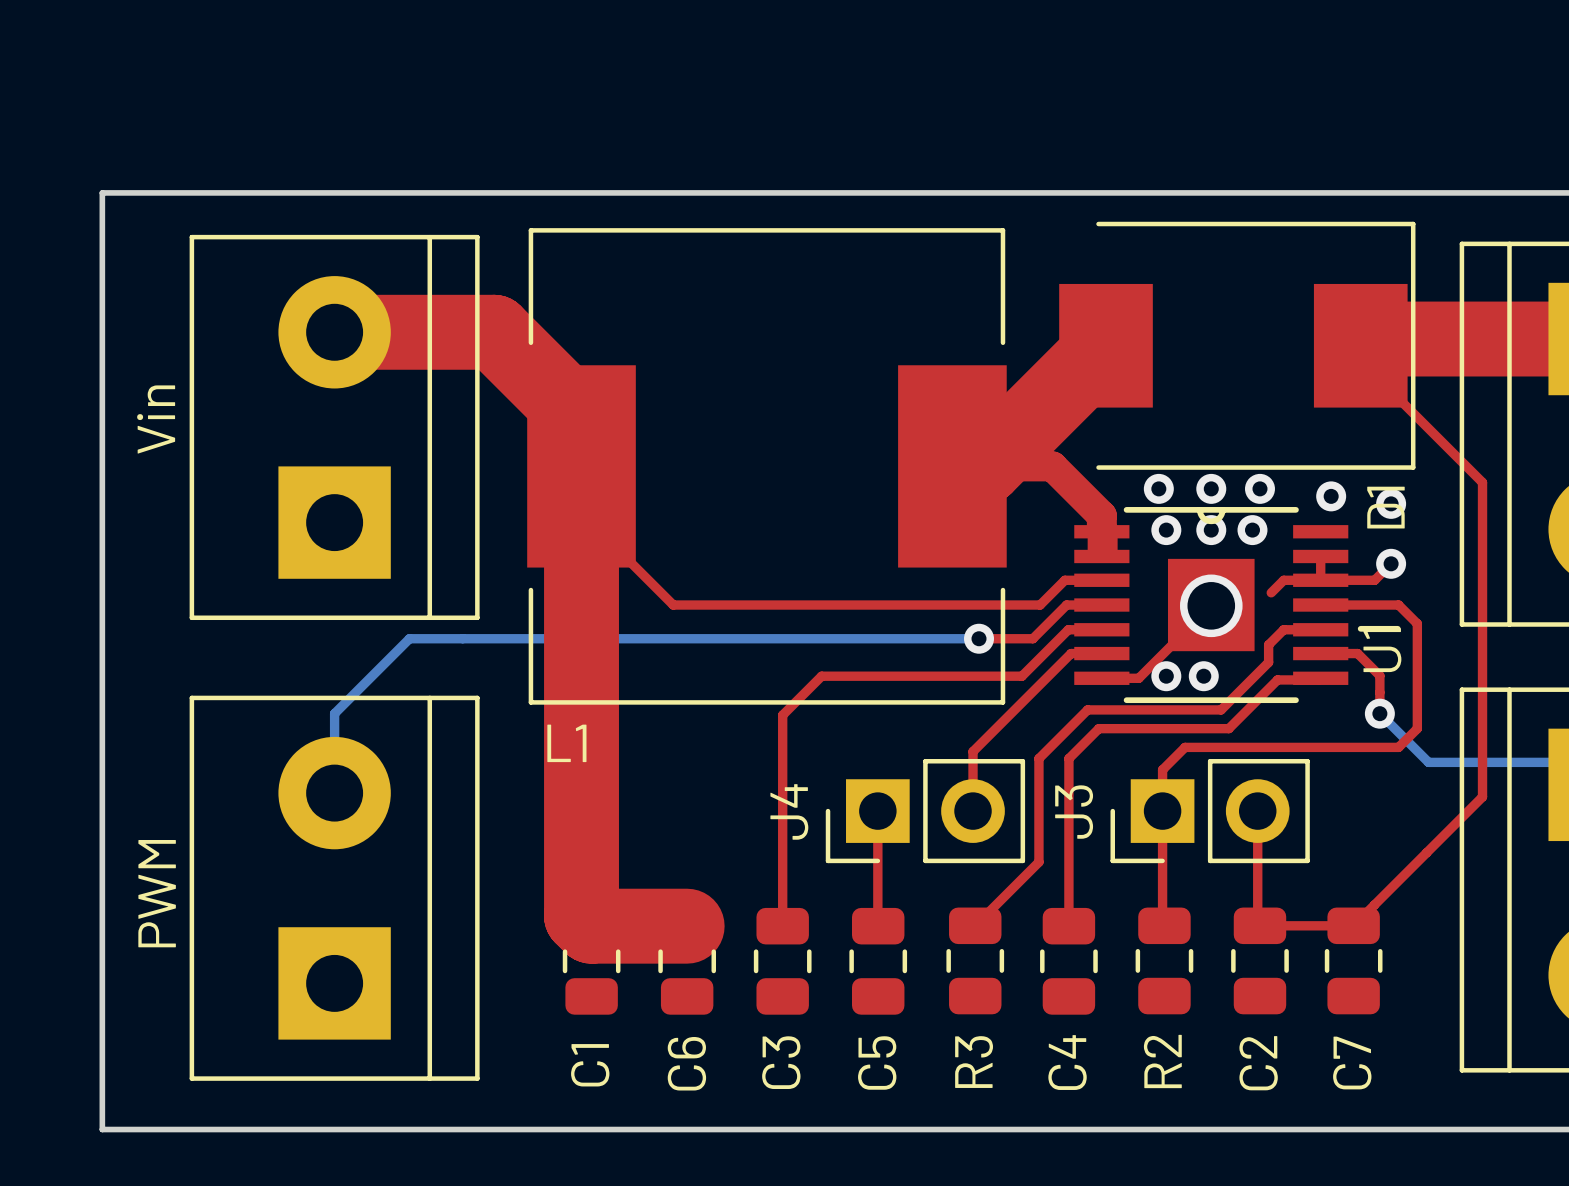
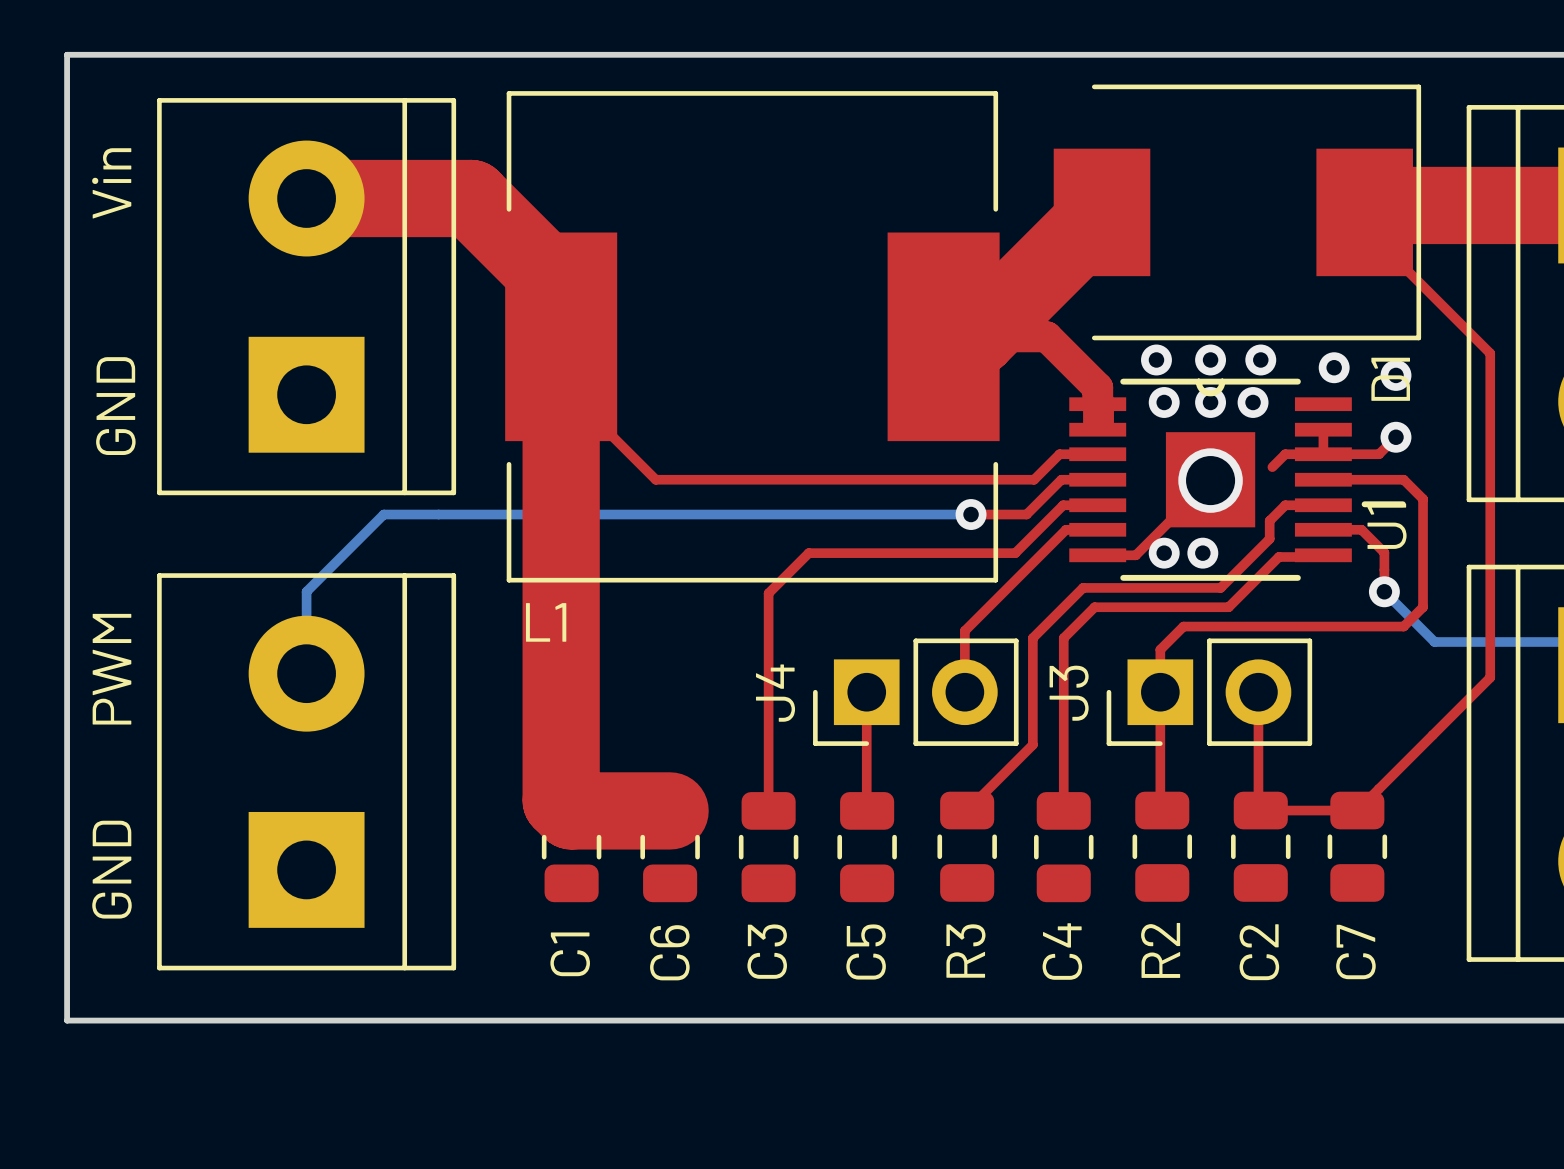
part value position: Vin (156, 419) -> Vin (111, 183)
text: none -> GND (115, 406)
part value position: PWM (157, 893) -> PWM (111, 669)
text: none -> GND (111, 869)

